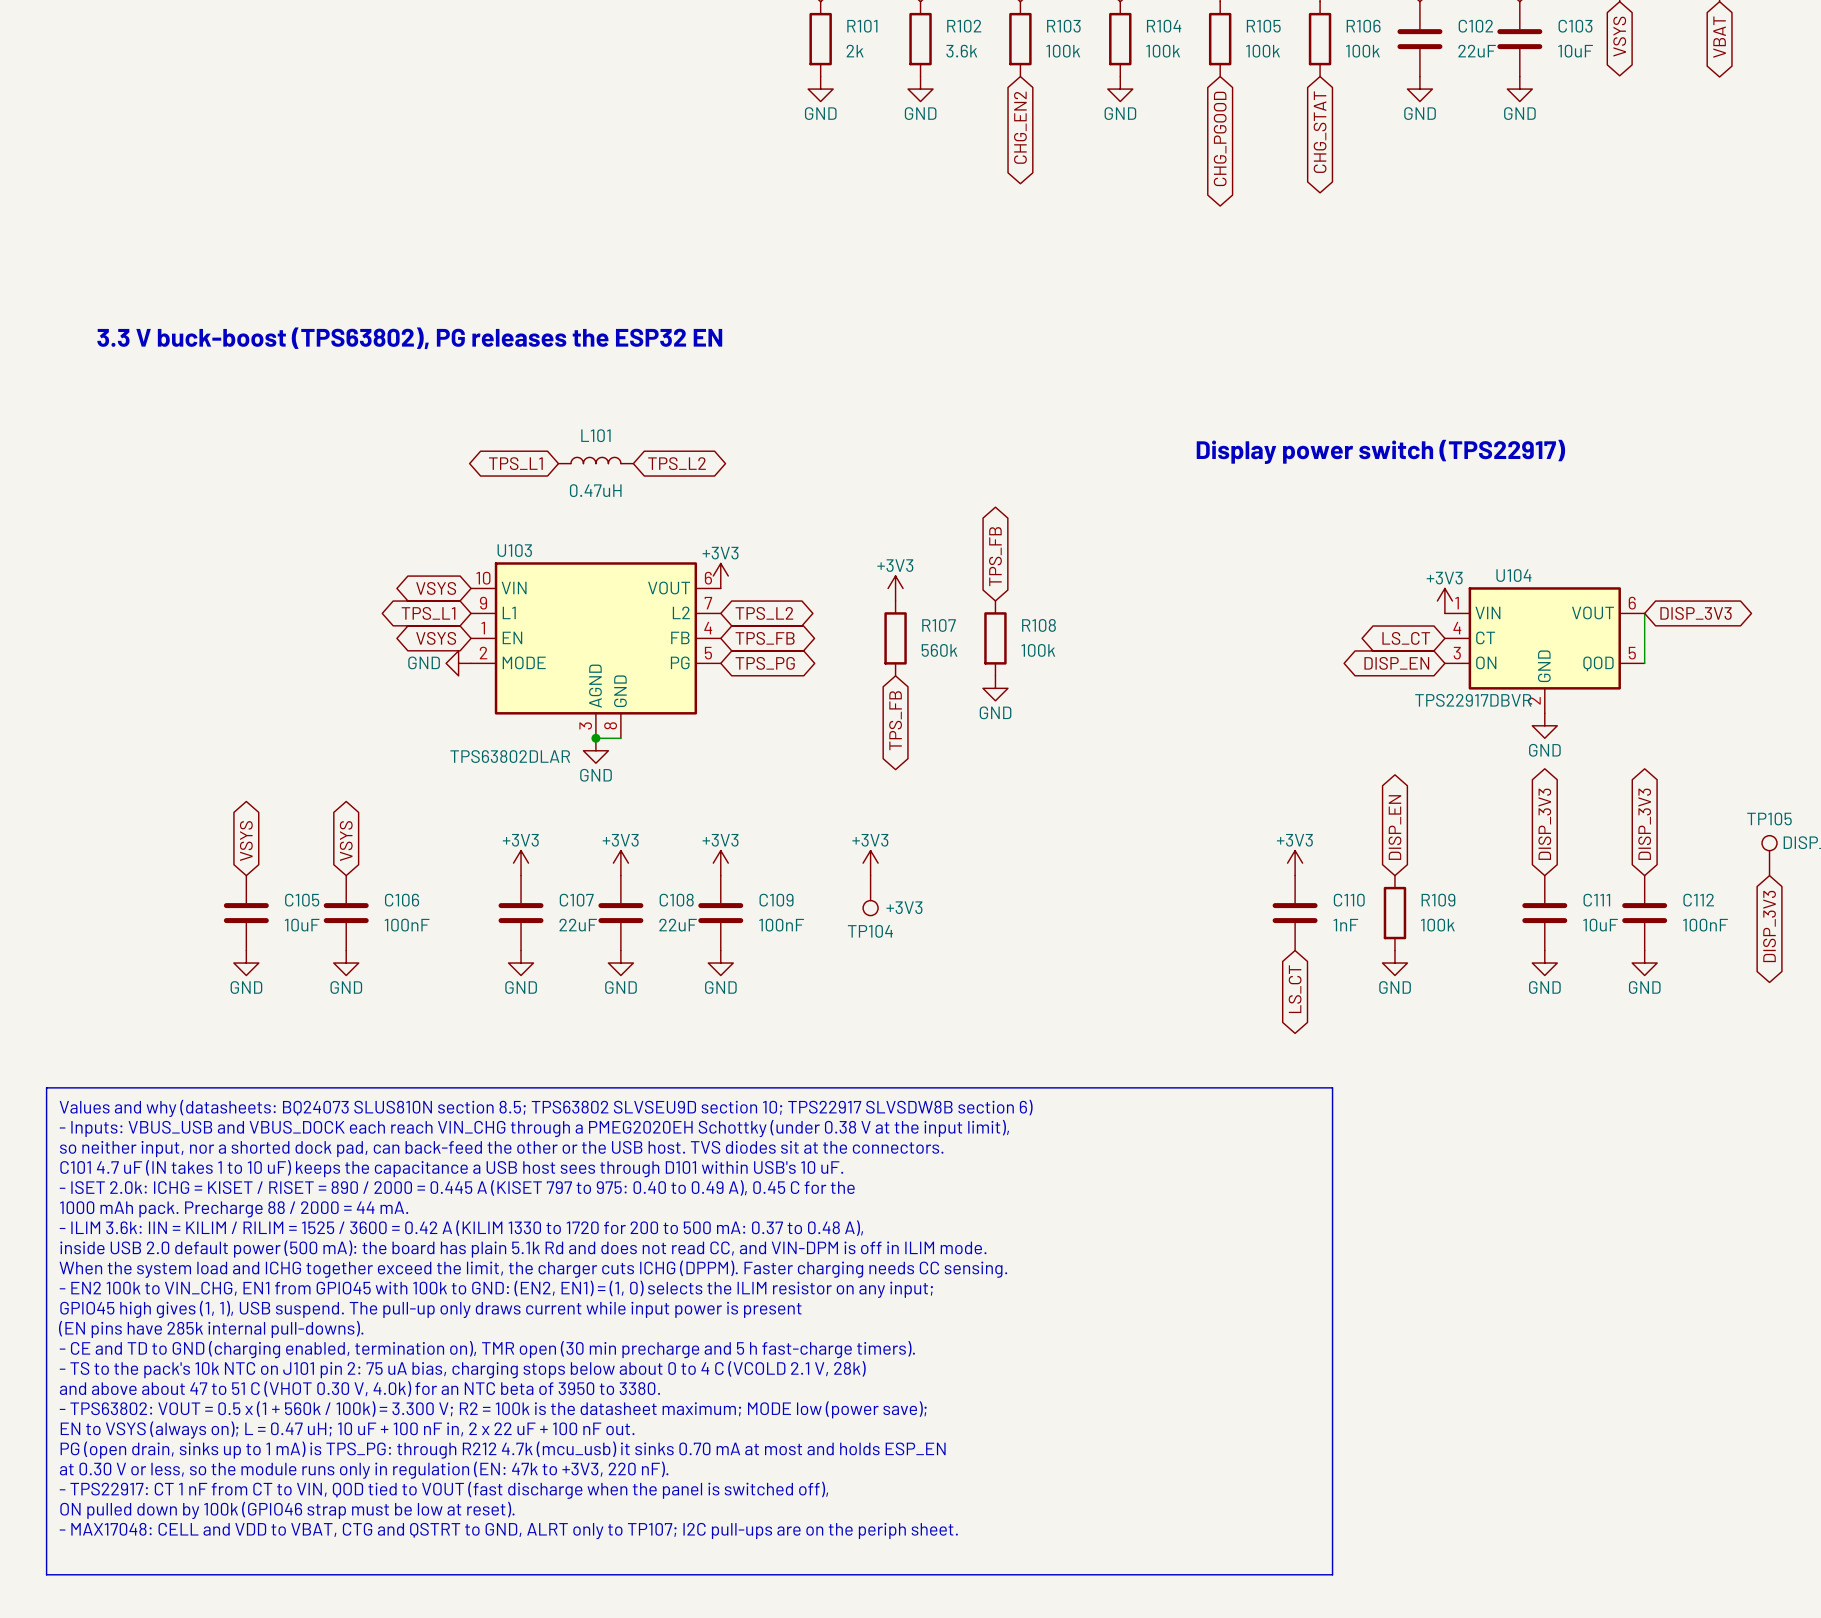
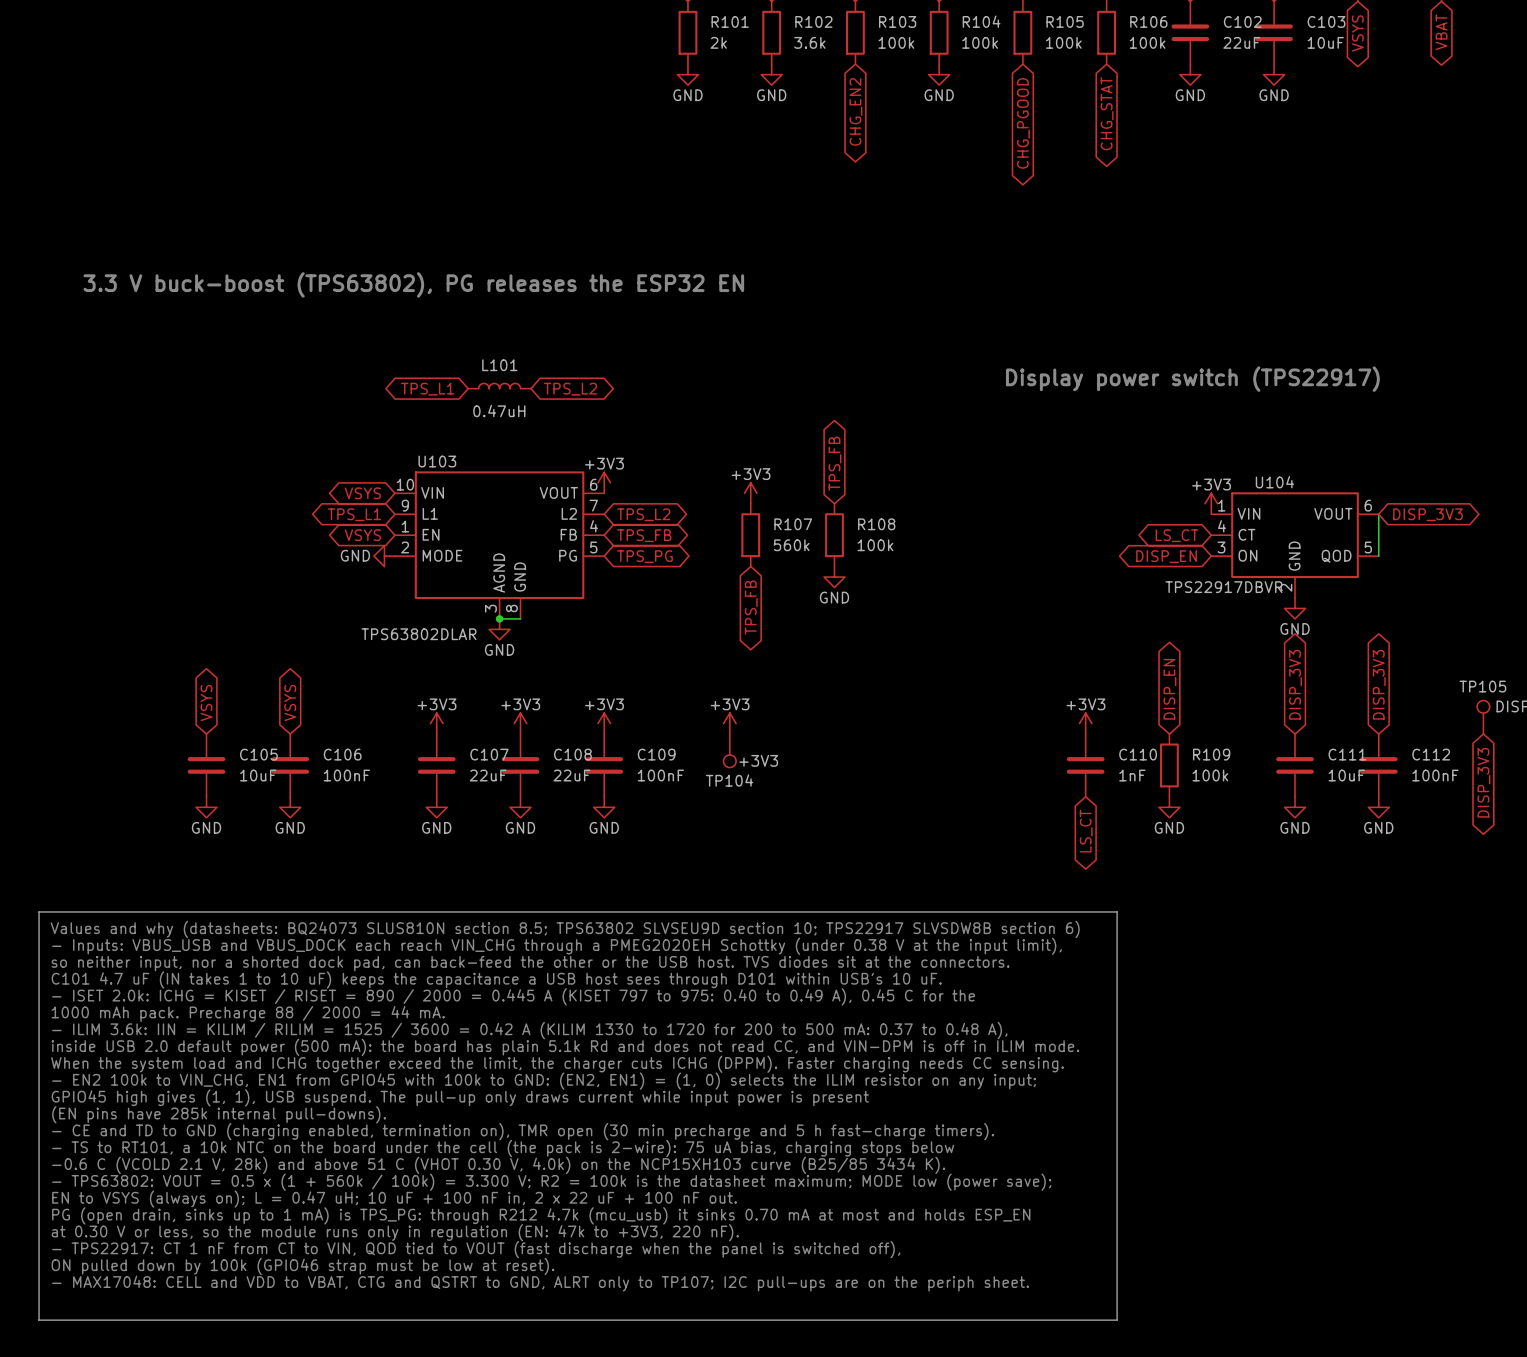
text: - TS to the pack's 10k NTC on J101 pin 2: 75 uA bias, charging stops below about 0 to 4 C (VCOLD 2.1 V, 28k) (462, 1369) -> - TS to RT101, a 10k NTC on the board under the cell (the pack is 2-wire): 75 uA bias, charging stops below (503, 1148)
text: and above about 47 to 51 C (VHOT 0.30 V, 4.0k) for an NTC beta of 3950 to 3380. (359, 1388) -> -0.6 C (VCOLD 2.1 V, 28k) and above 51 C (VHOT 0.30 V, 4.0k) on the NCP15XH103 curve (B25/85 3434 K). (498, 1165)

